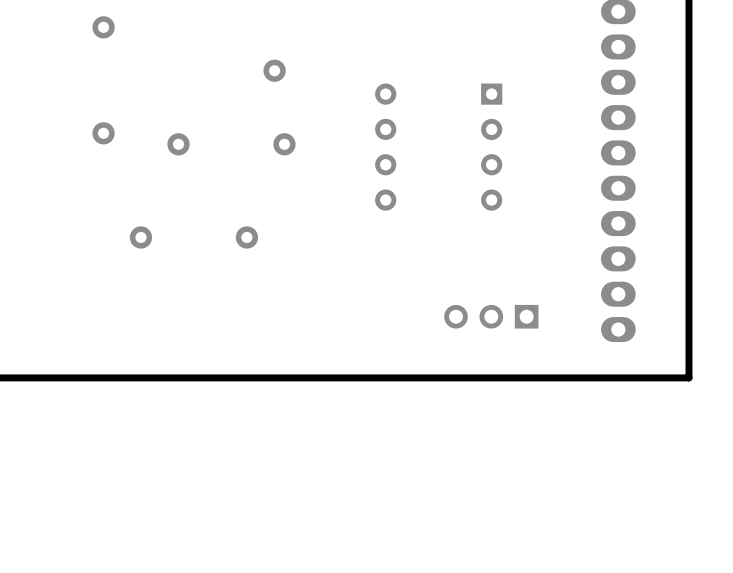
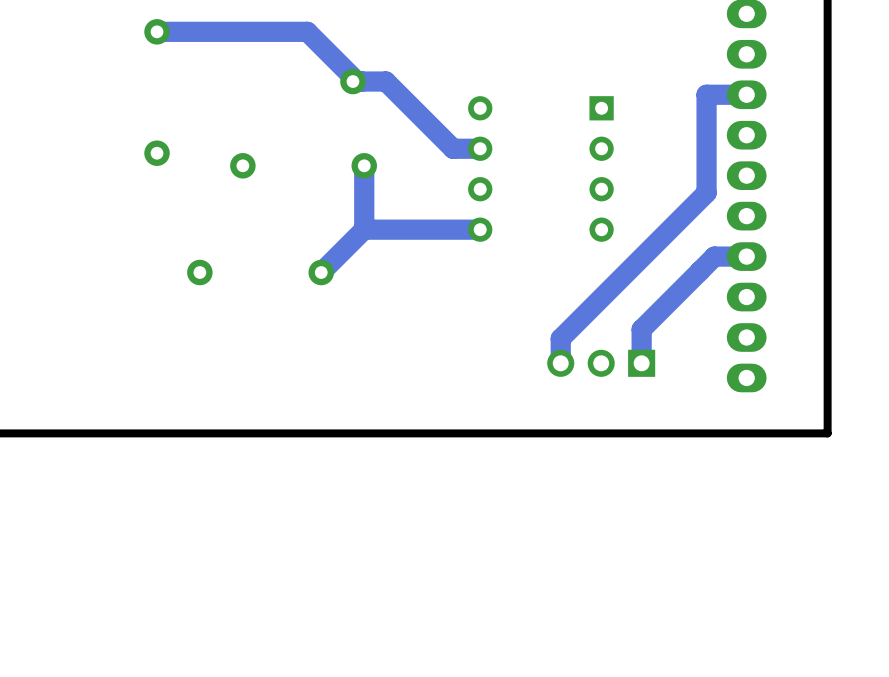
track: none -> (157, 31) (307, 31) (357, 81)
track: none -> (352, 81) (385, 81) (453, 148) (480, 148)
track: none -> (746, 94) (706, 94) (706, 192) (560, 338) (560, 363)
track: none -> (364, 165) (364, 229)
track: none -> (480, 229) (364, 229) (321, 272)
track: none -> (746, 256) (714, 256) (641, 329) (641, 363)

